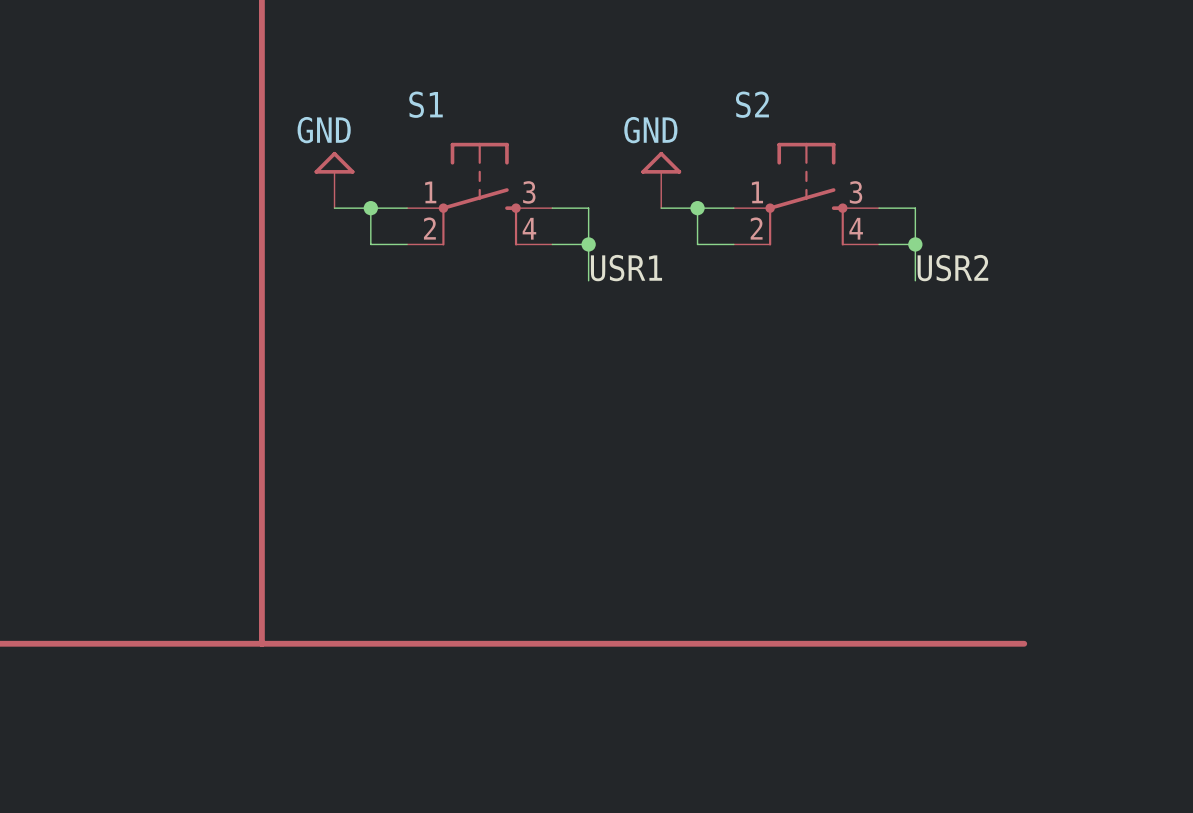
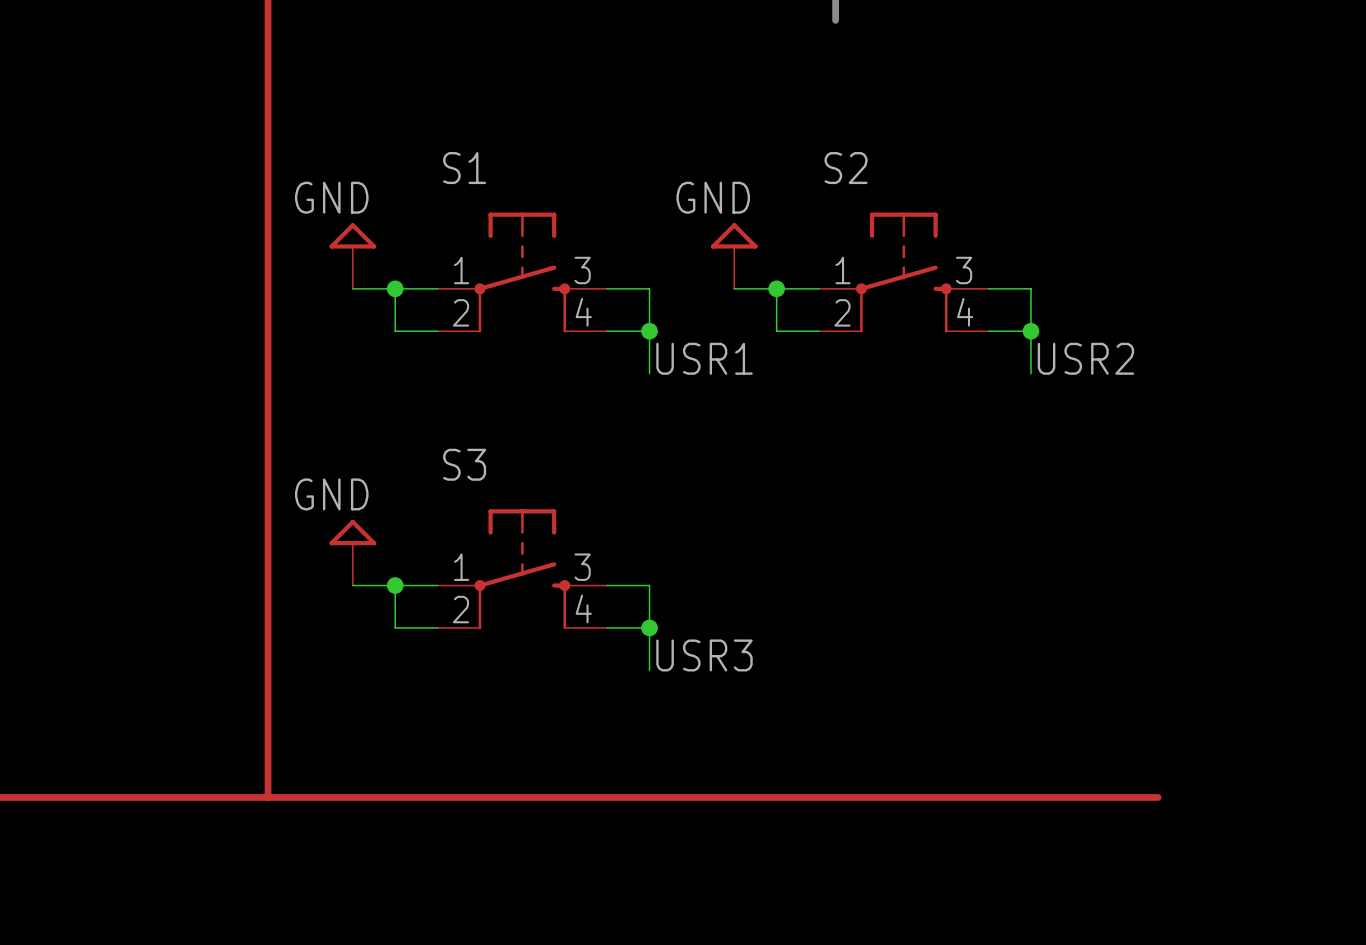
power symbol: none -> GND (352, 552)
S3: none -> (522, 569)
wire: none -> (352, 585) (437, 585)
wire: none -> (395, 585) (395, 627) (437, 627)
junction: none -> (395, 585)
wire: none -> (607, 585) (649, 585) (649, 670)
wire: none -> (607, 627) (649, 627)
junction: none -> (649, 627)
label: none -> USR3 (704, 655)

